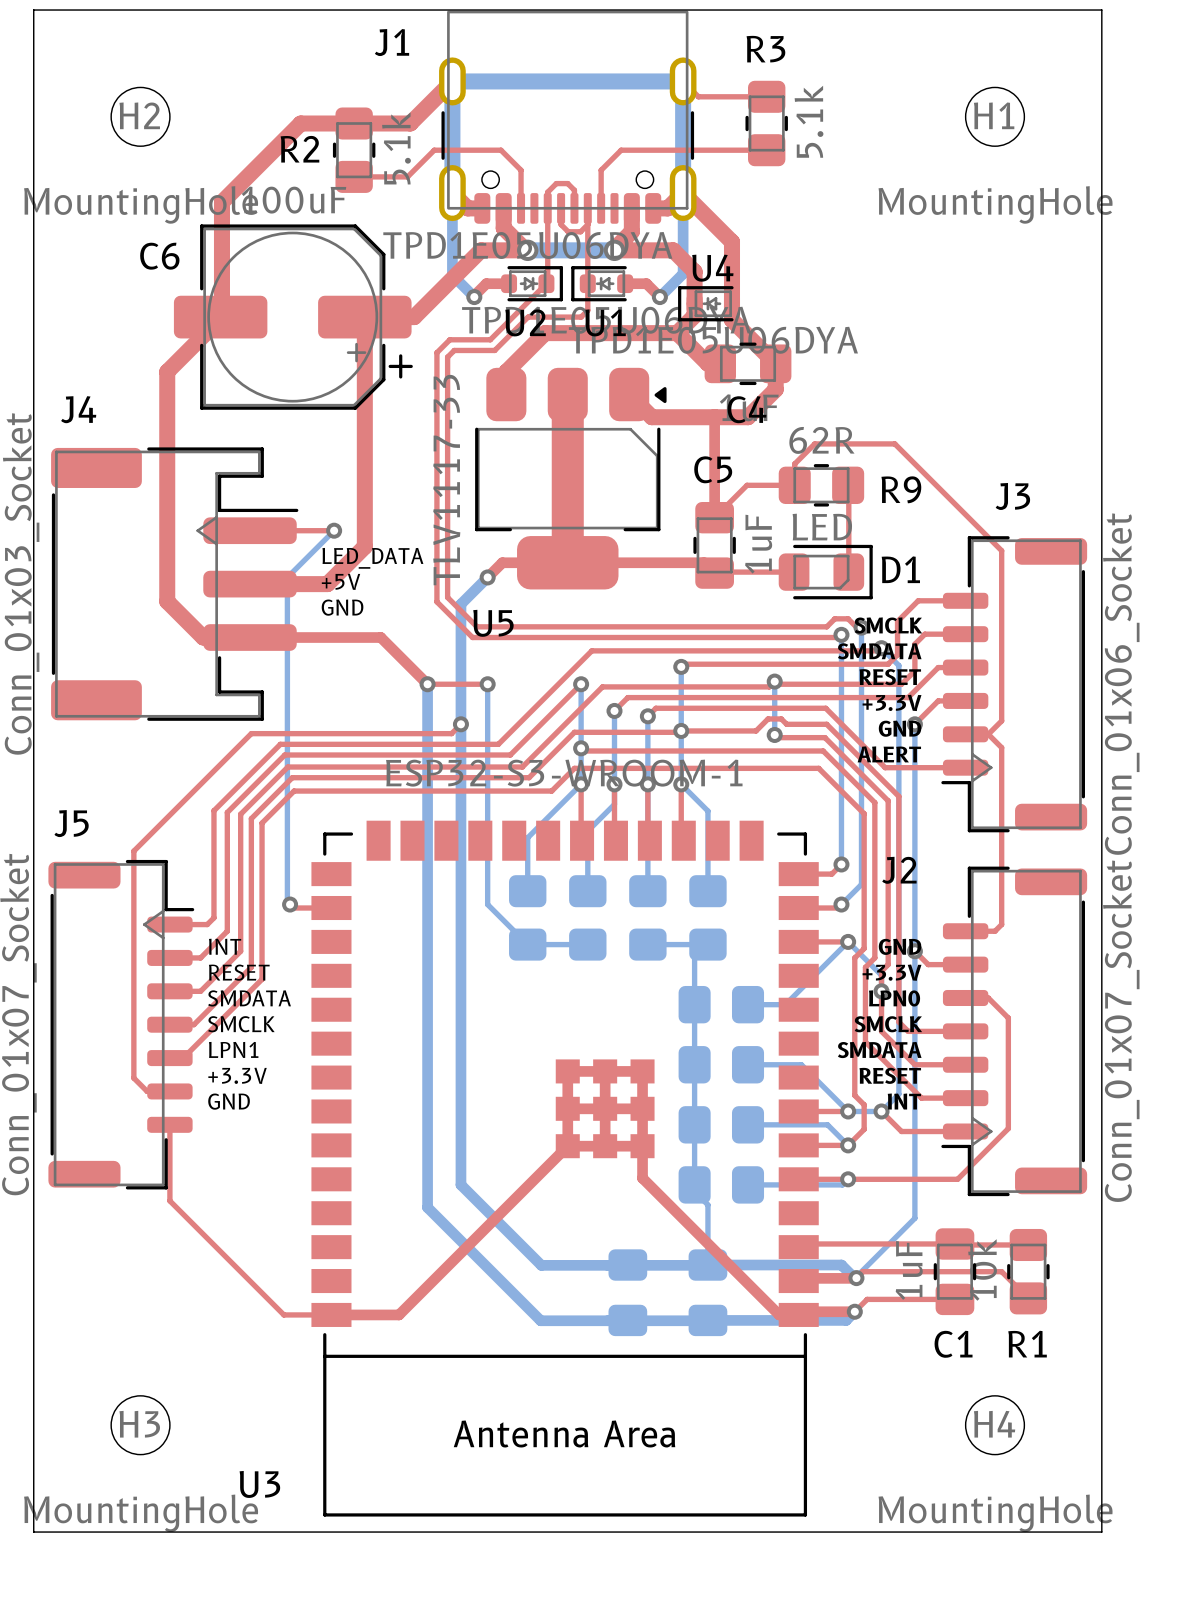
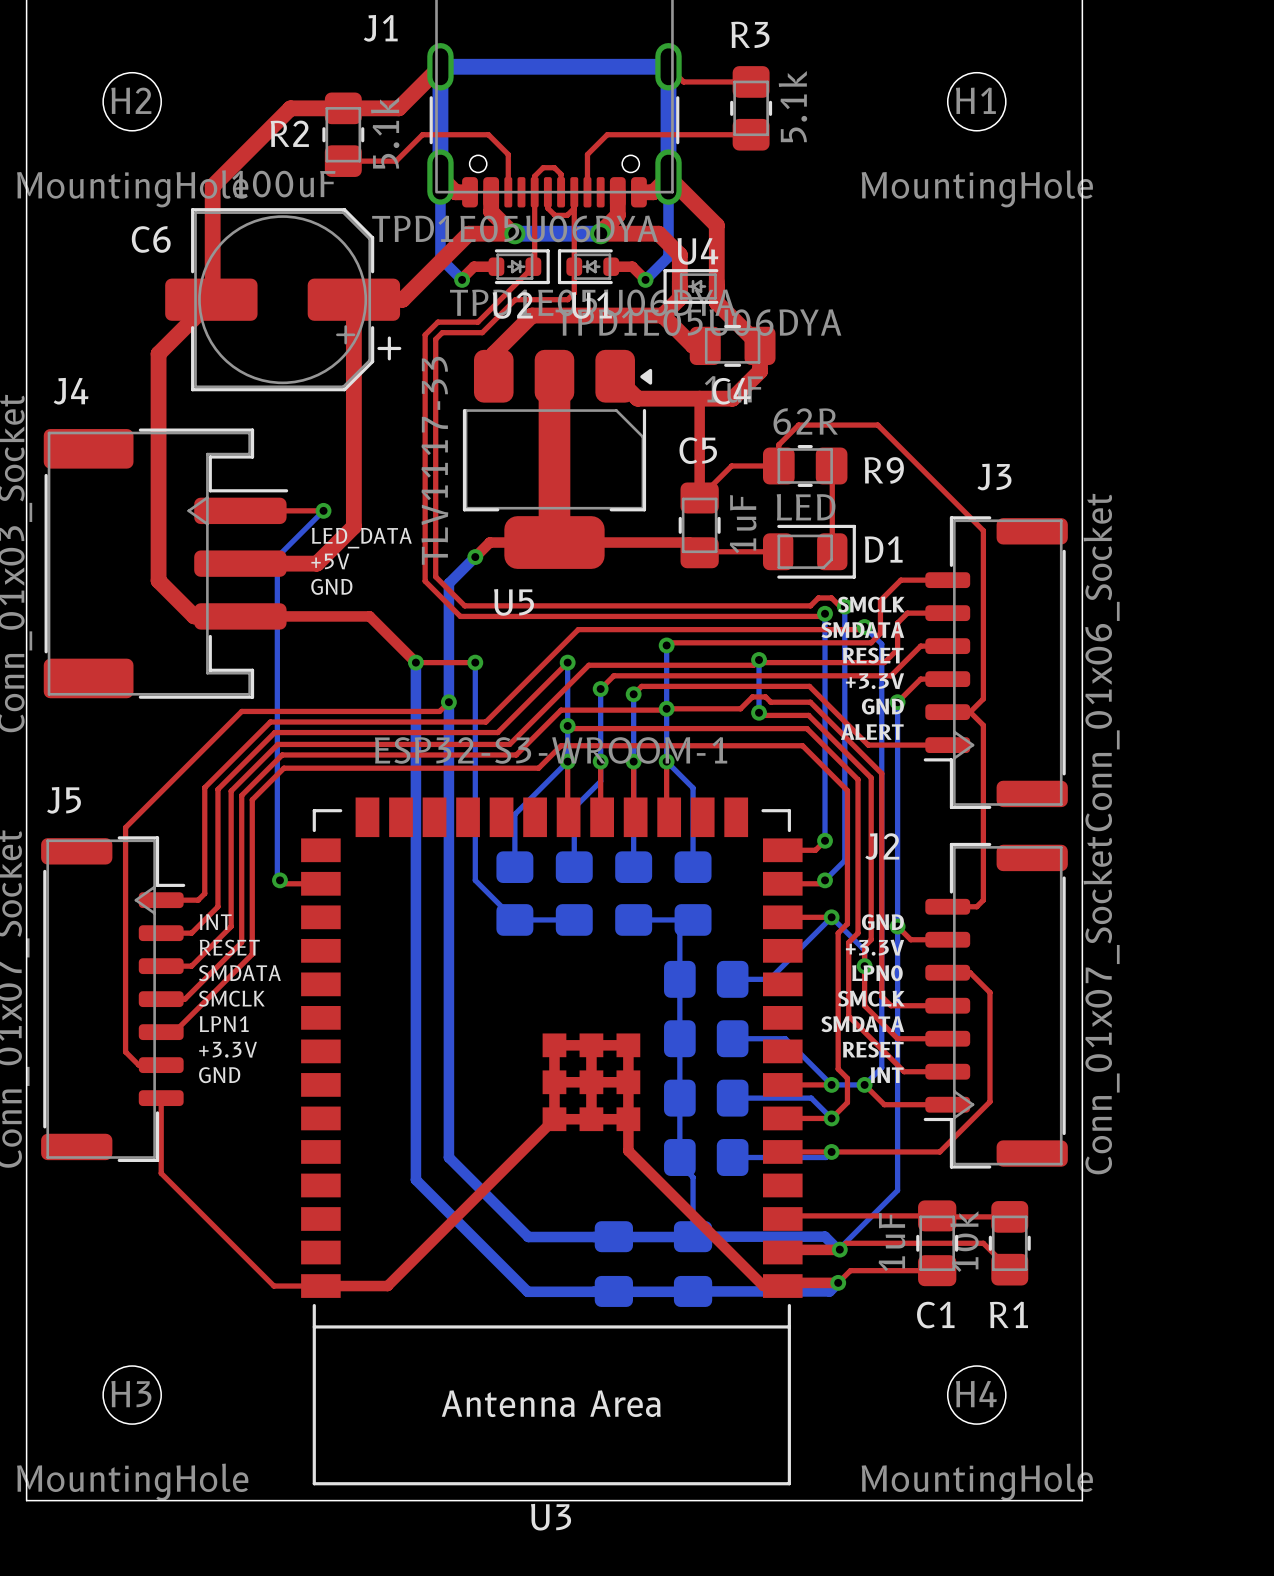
U5 name position: U5 (493, 623) -> U5 (514, 602)
U3 name position: U3 (259, 1484) -> U3 (551, 1517)

